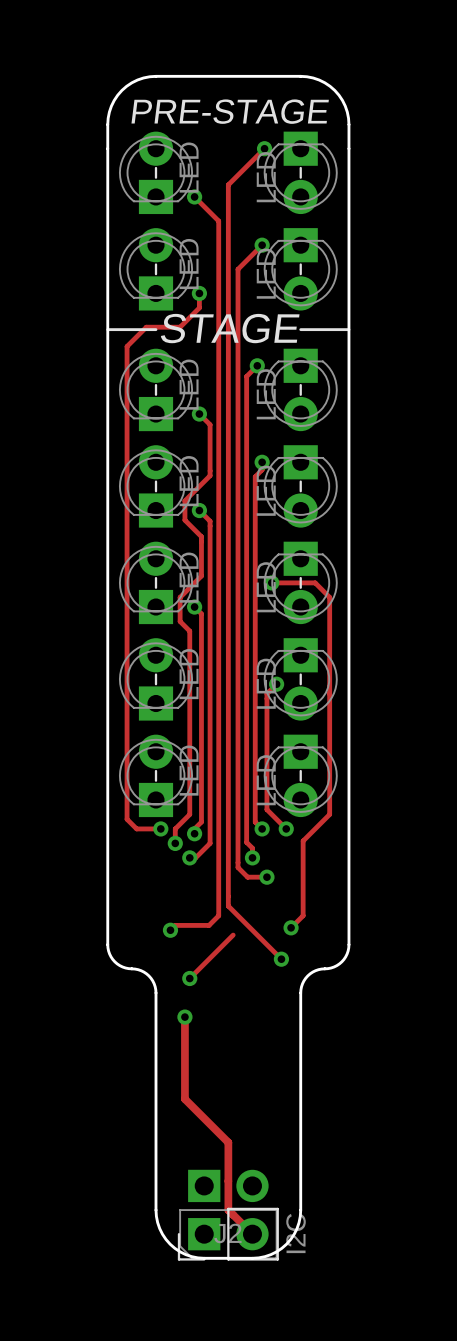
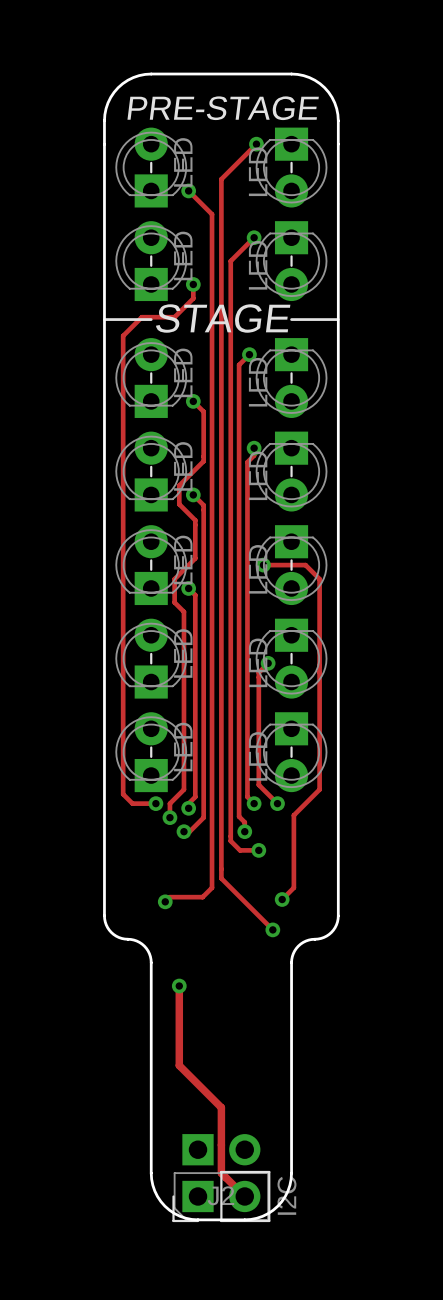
track: (233, 935) (189, 978) -> none
via: (189, 978) -> none

